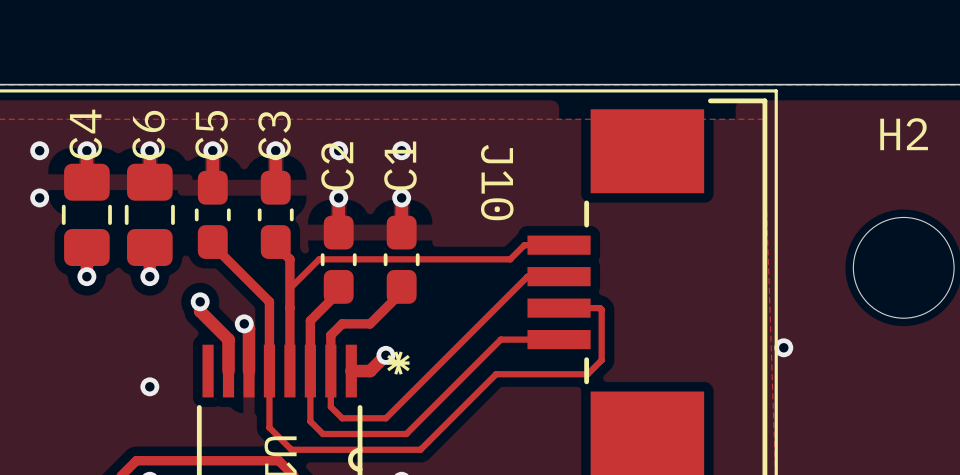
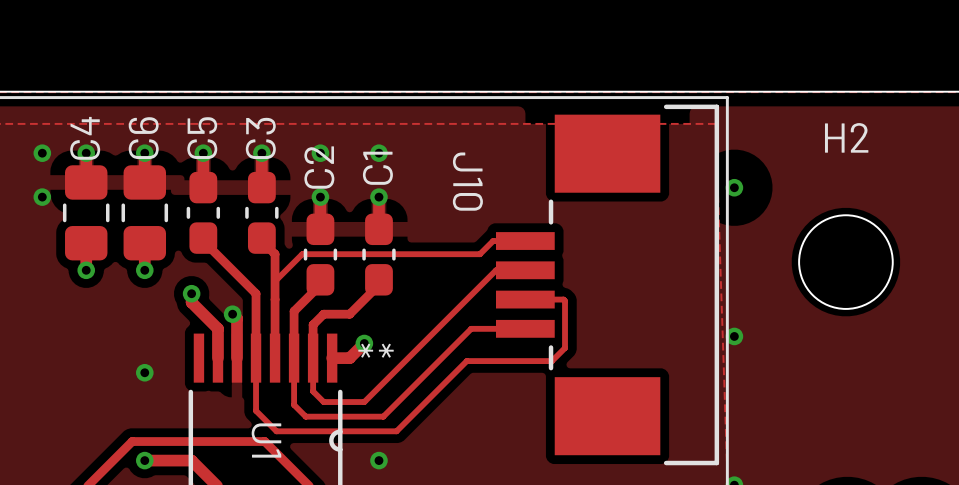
via: none -> (734, 187)

